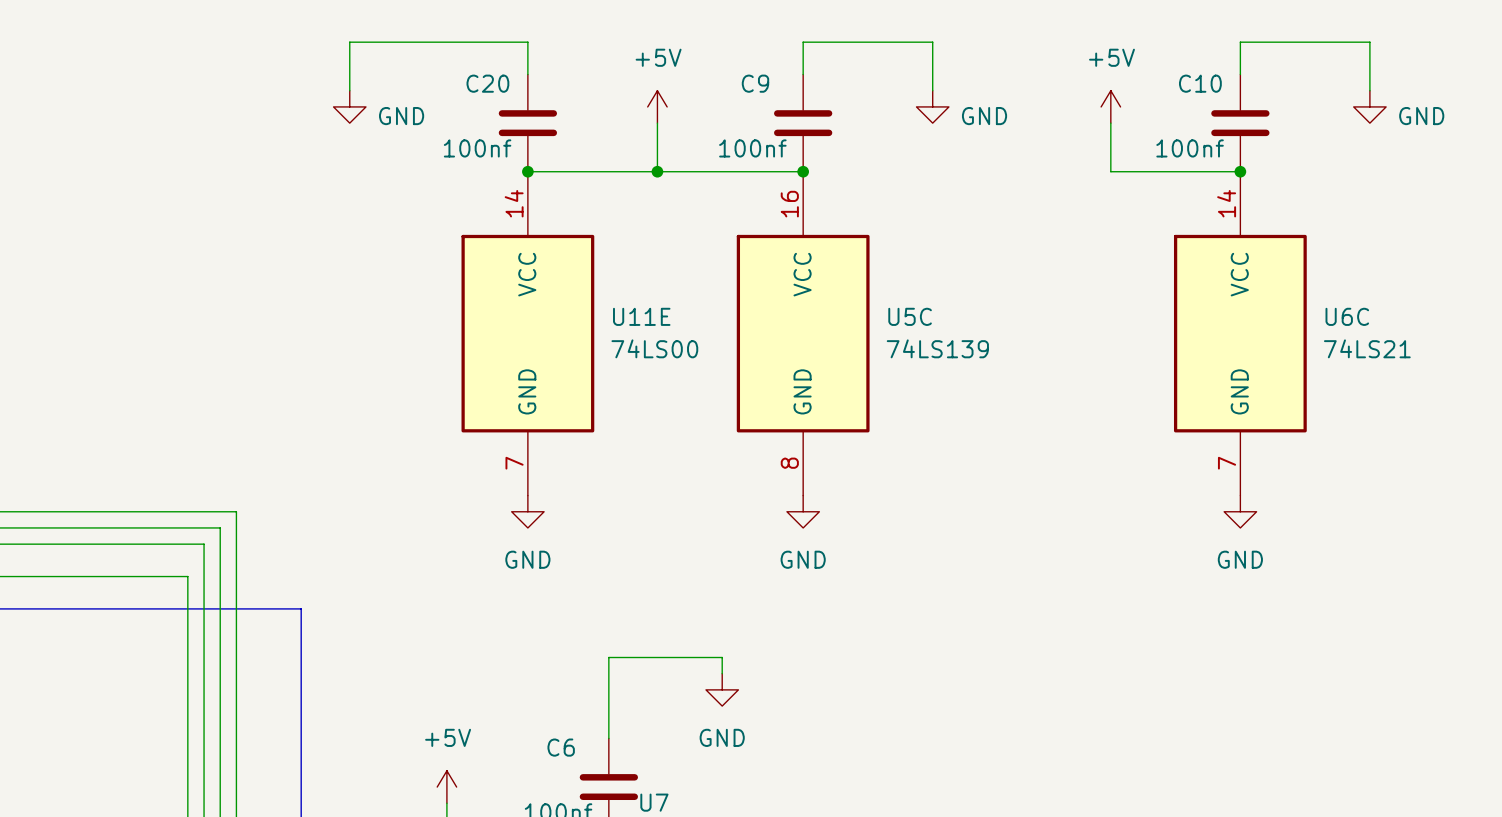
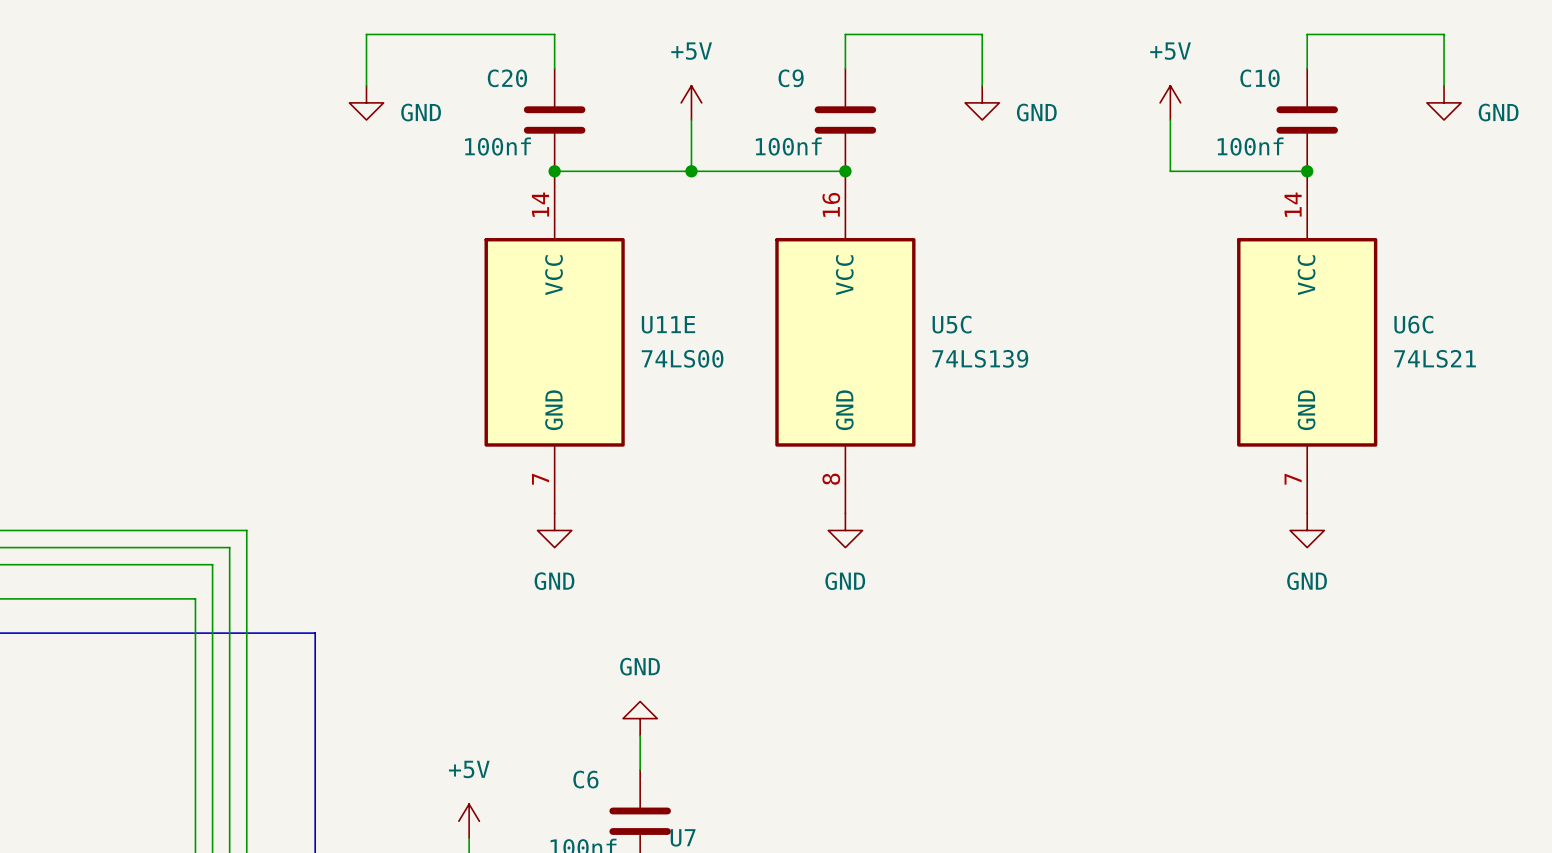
wire: (722, 673) (722, 657) (608, 657) (608, 706) -> none
power symbol rotation: 0° (722, 689) -> 180° (640, 718)
power symbol position: GND (722, 689) -> GND (640, 718)

